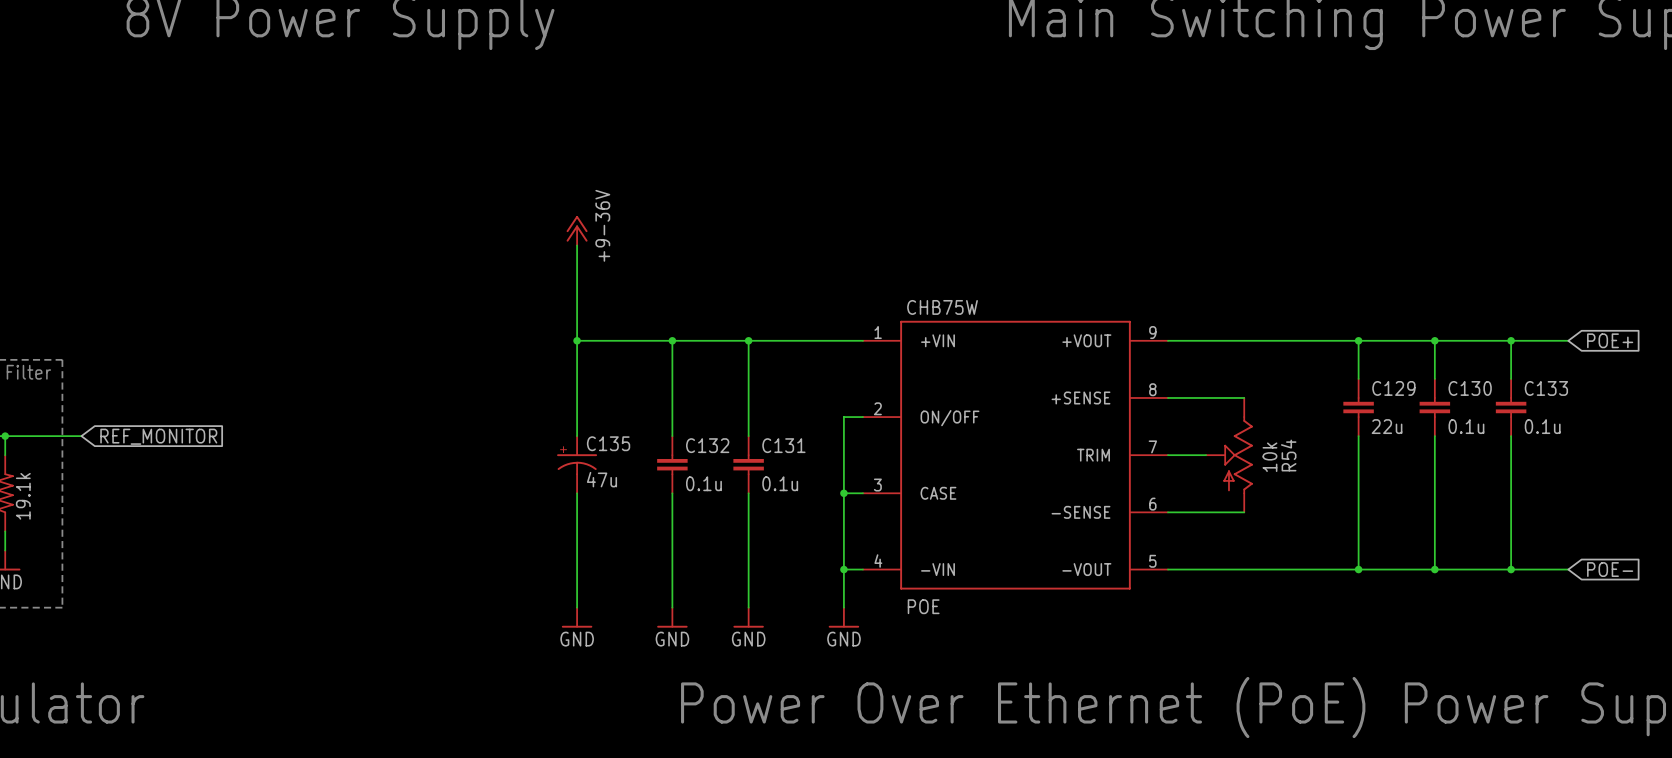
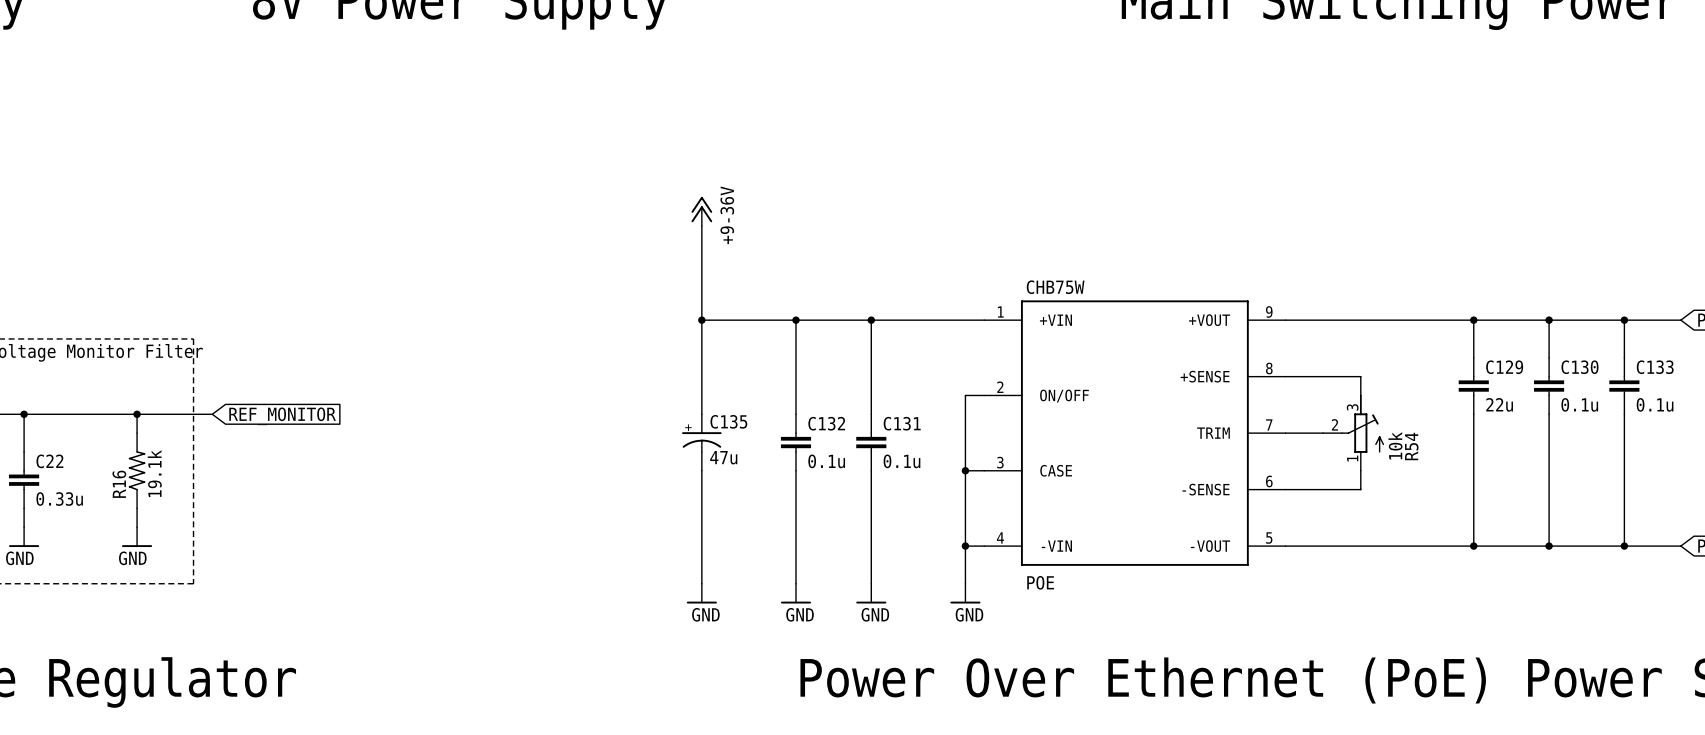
R54 symbol: [1206, 397, 1253, 513] -> [1323, 394, 1384, 471]

